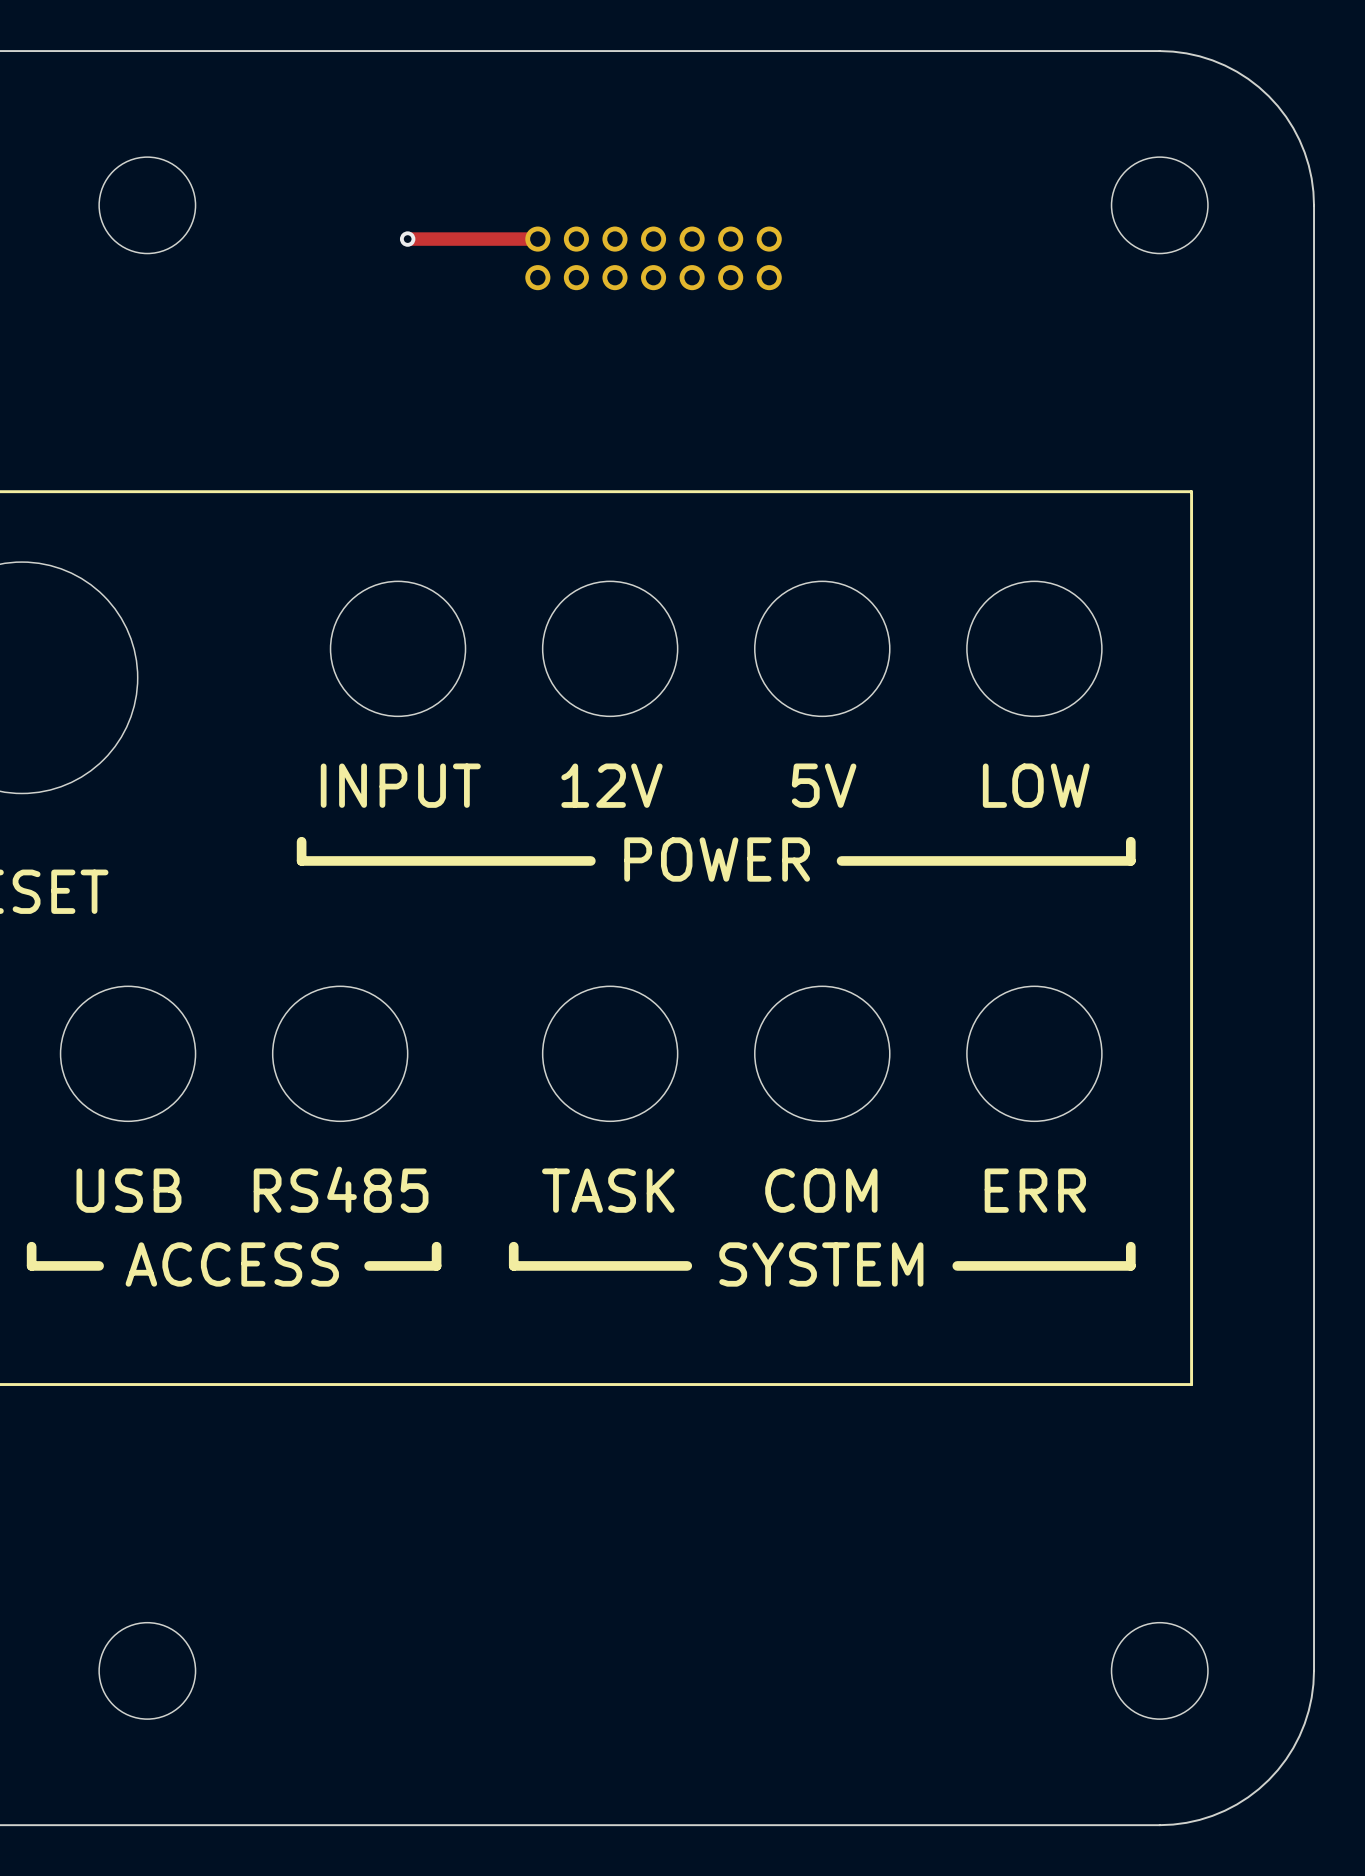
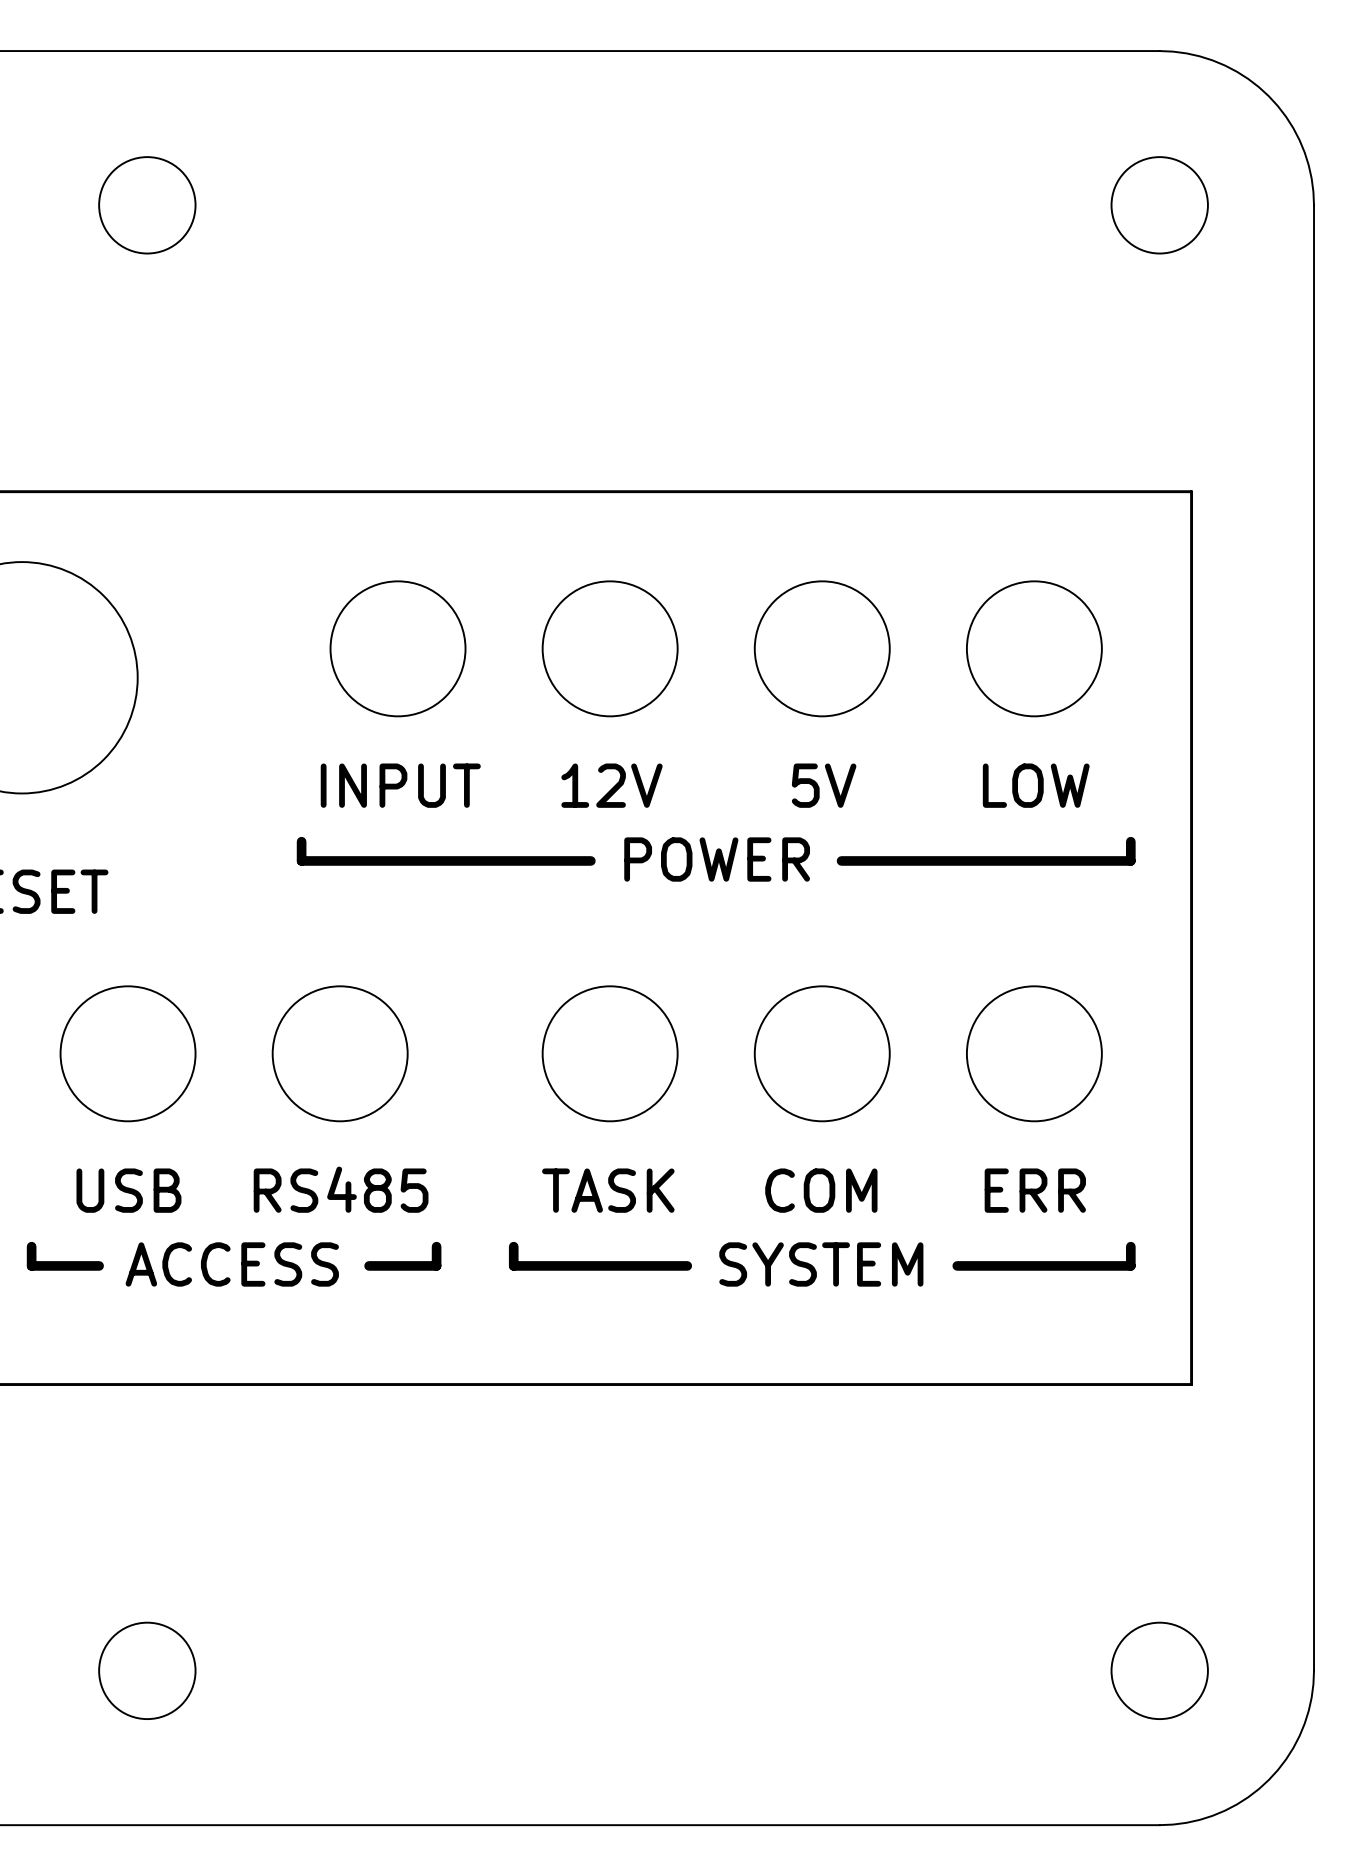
track: (407, 239) (537, 239) -> none
via: (407, 239) -> none
part: (653, 258) -> none

